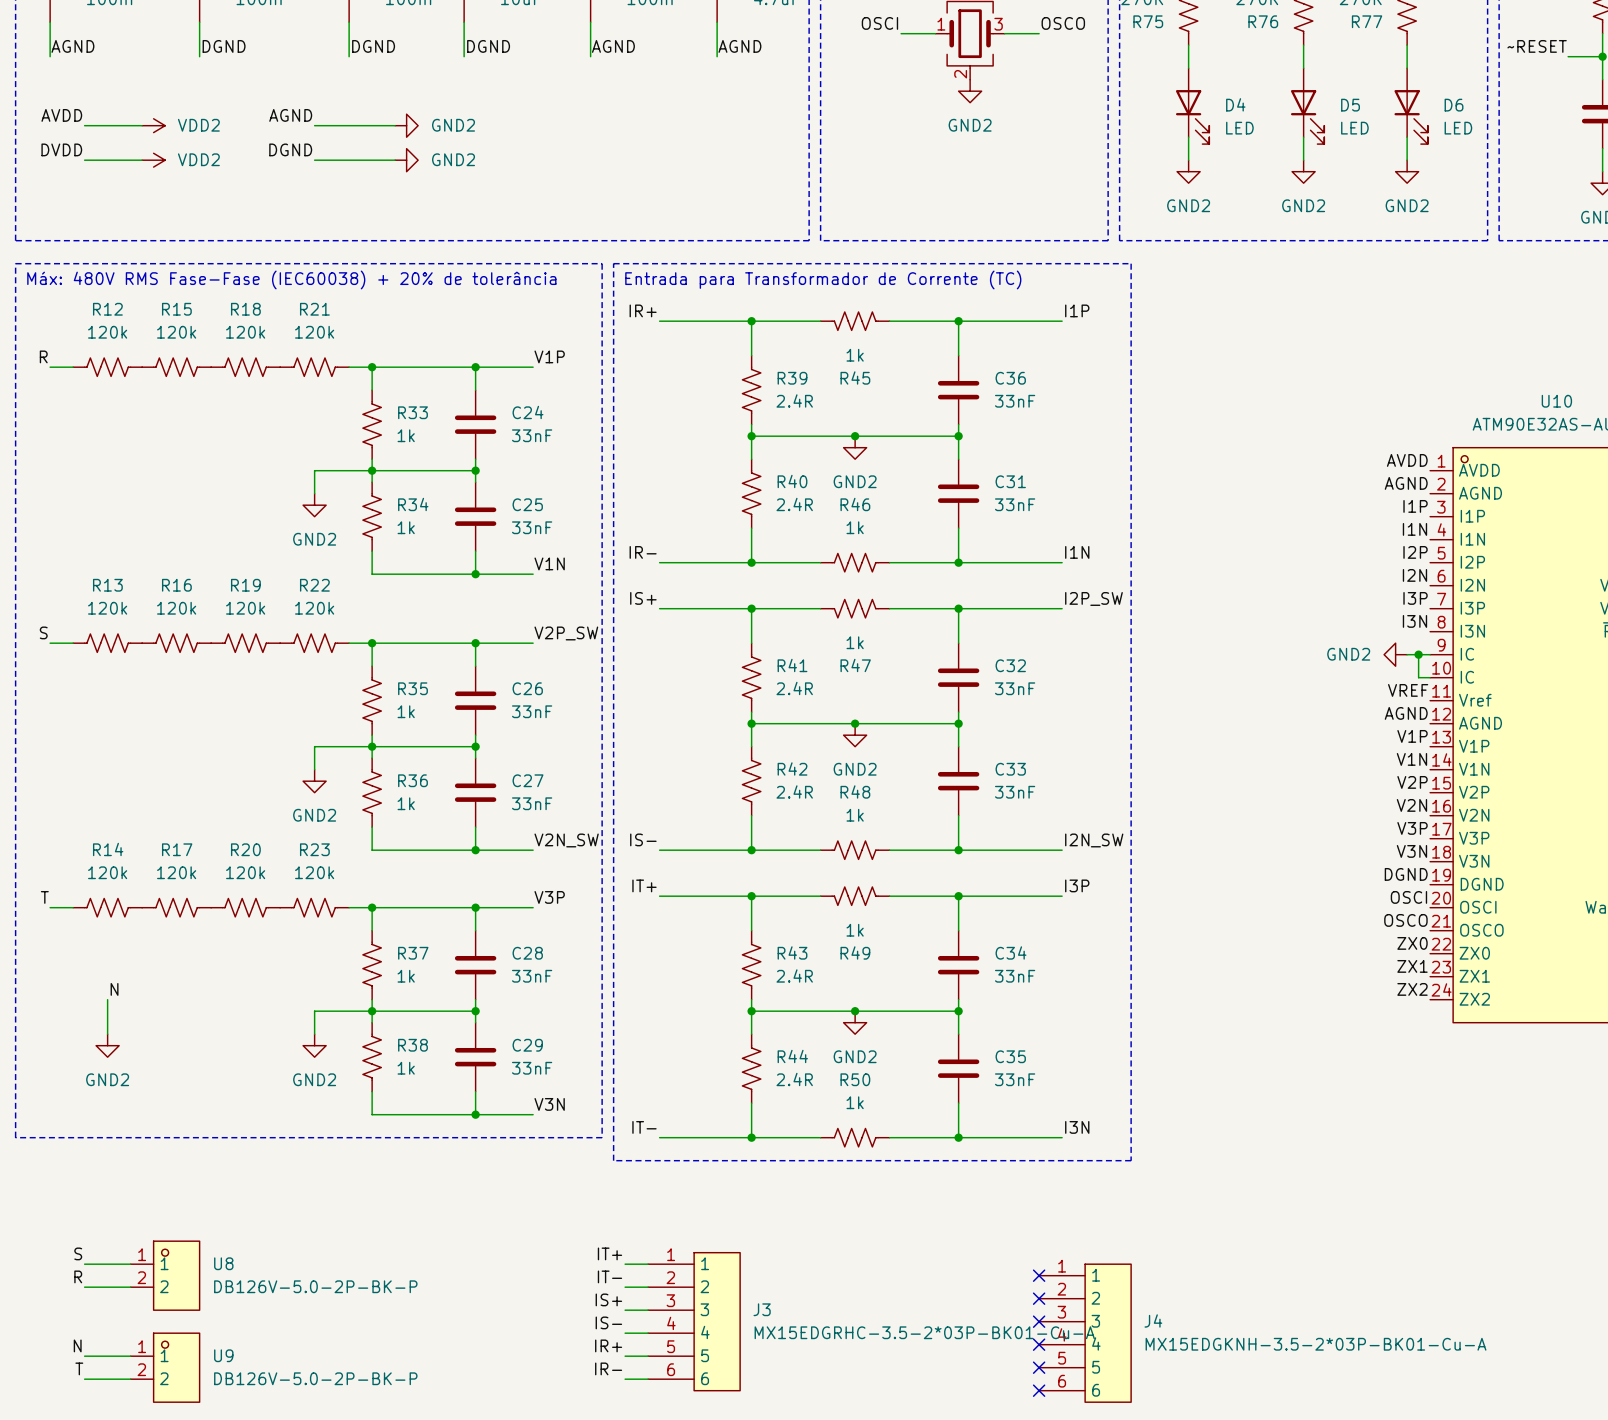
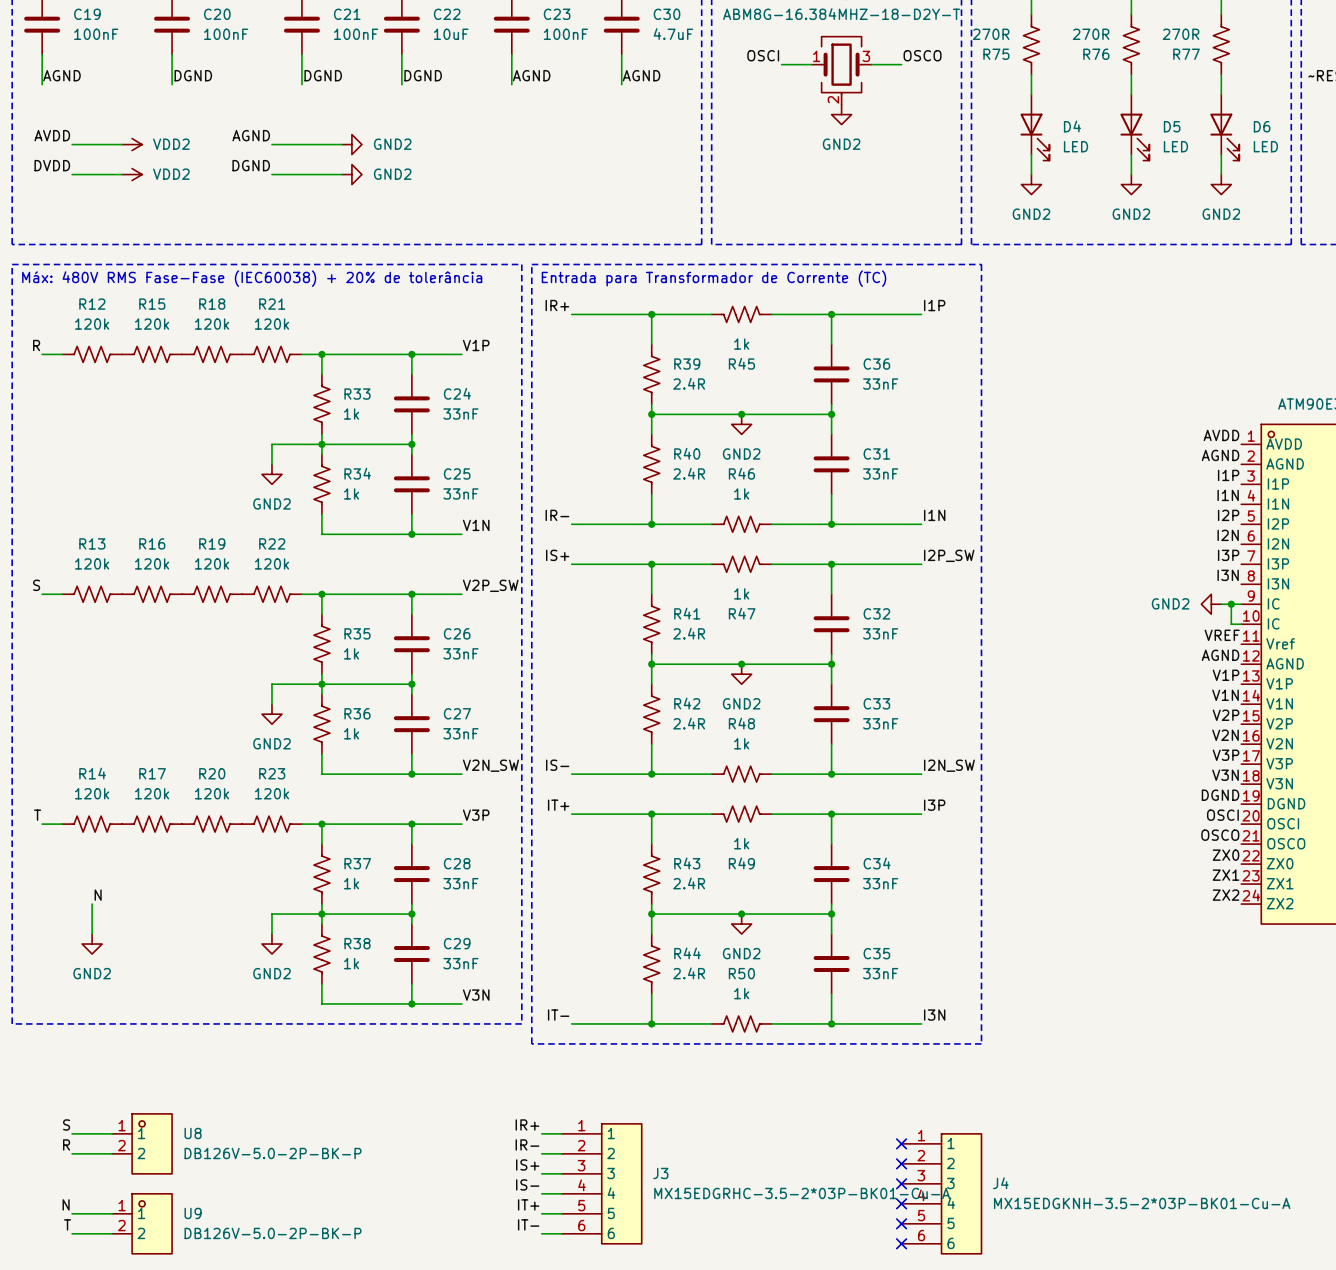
label: IT+ (609, 1253) -> IR+ (527, 1124)
label: IT- (609, 1276) -> IR- (527, 1144)
label: IR+ (608, 1345) -> IT+ (528, 1204)
label: IR- (608, 1368) -> IT- (528, 1224)

